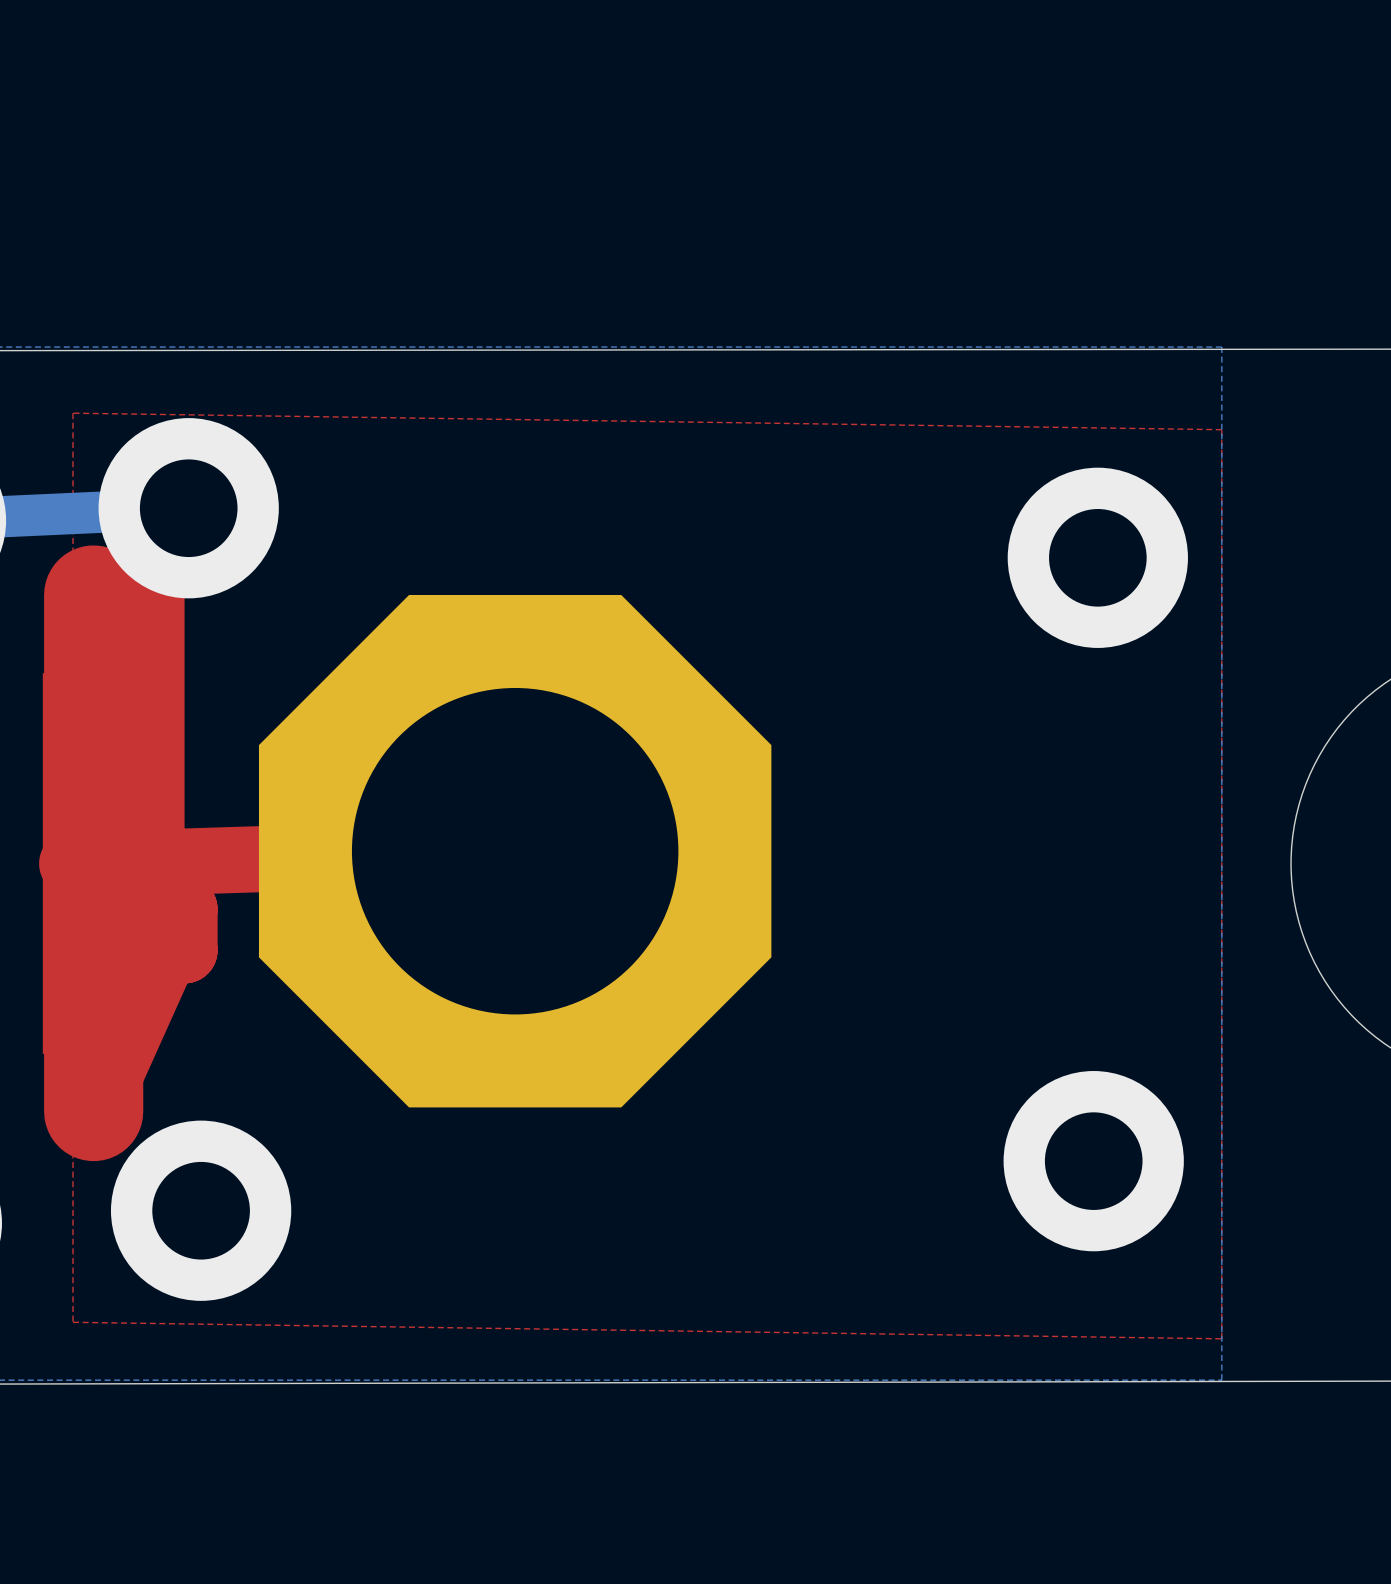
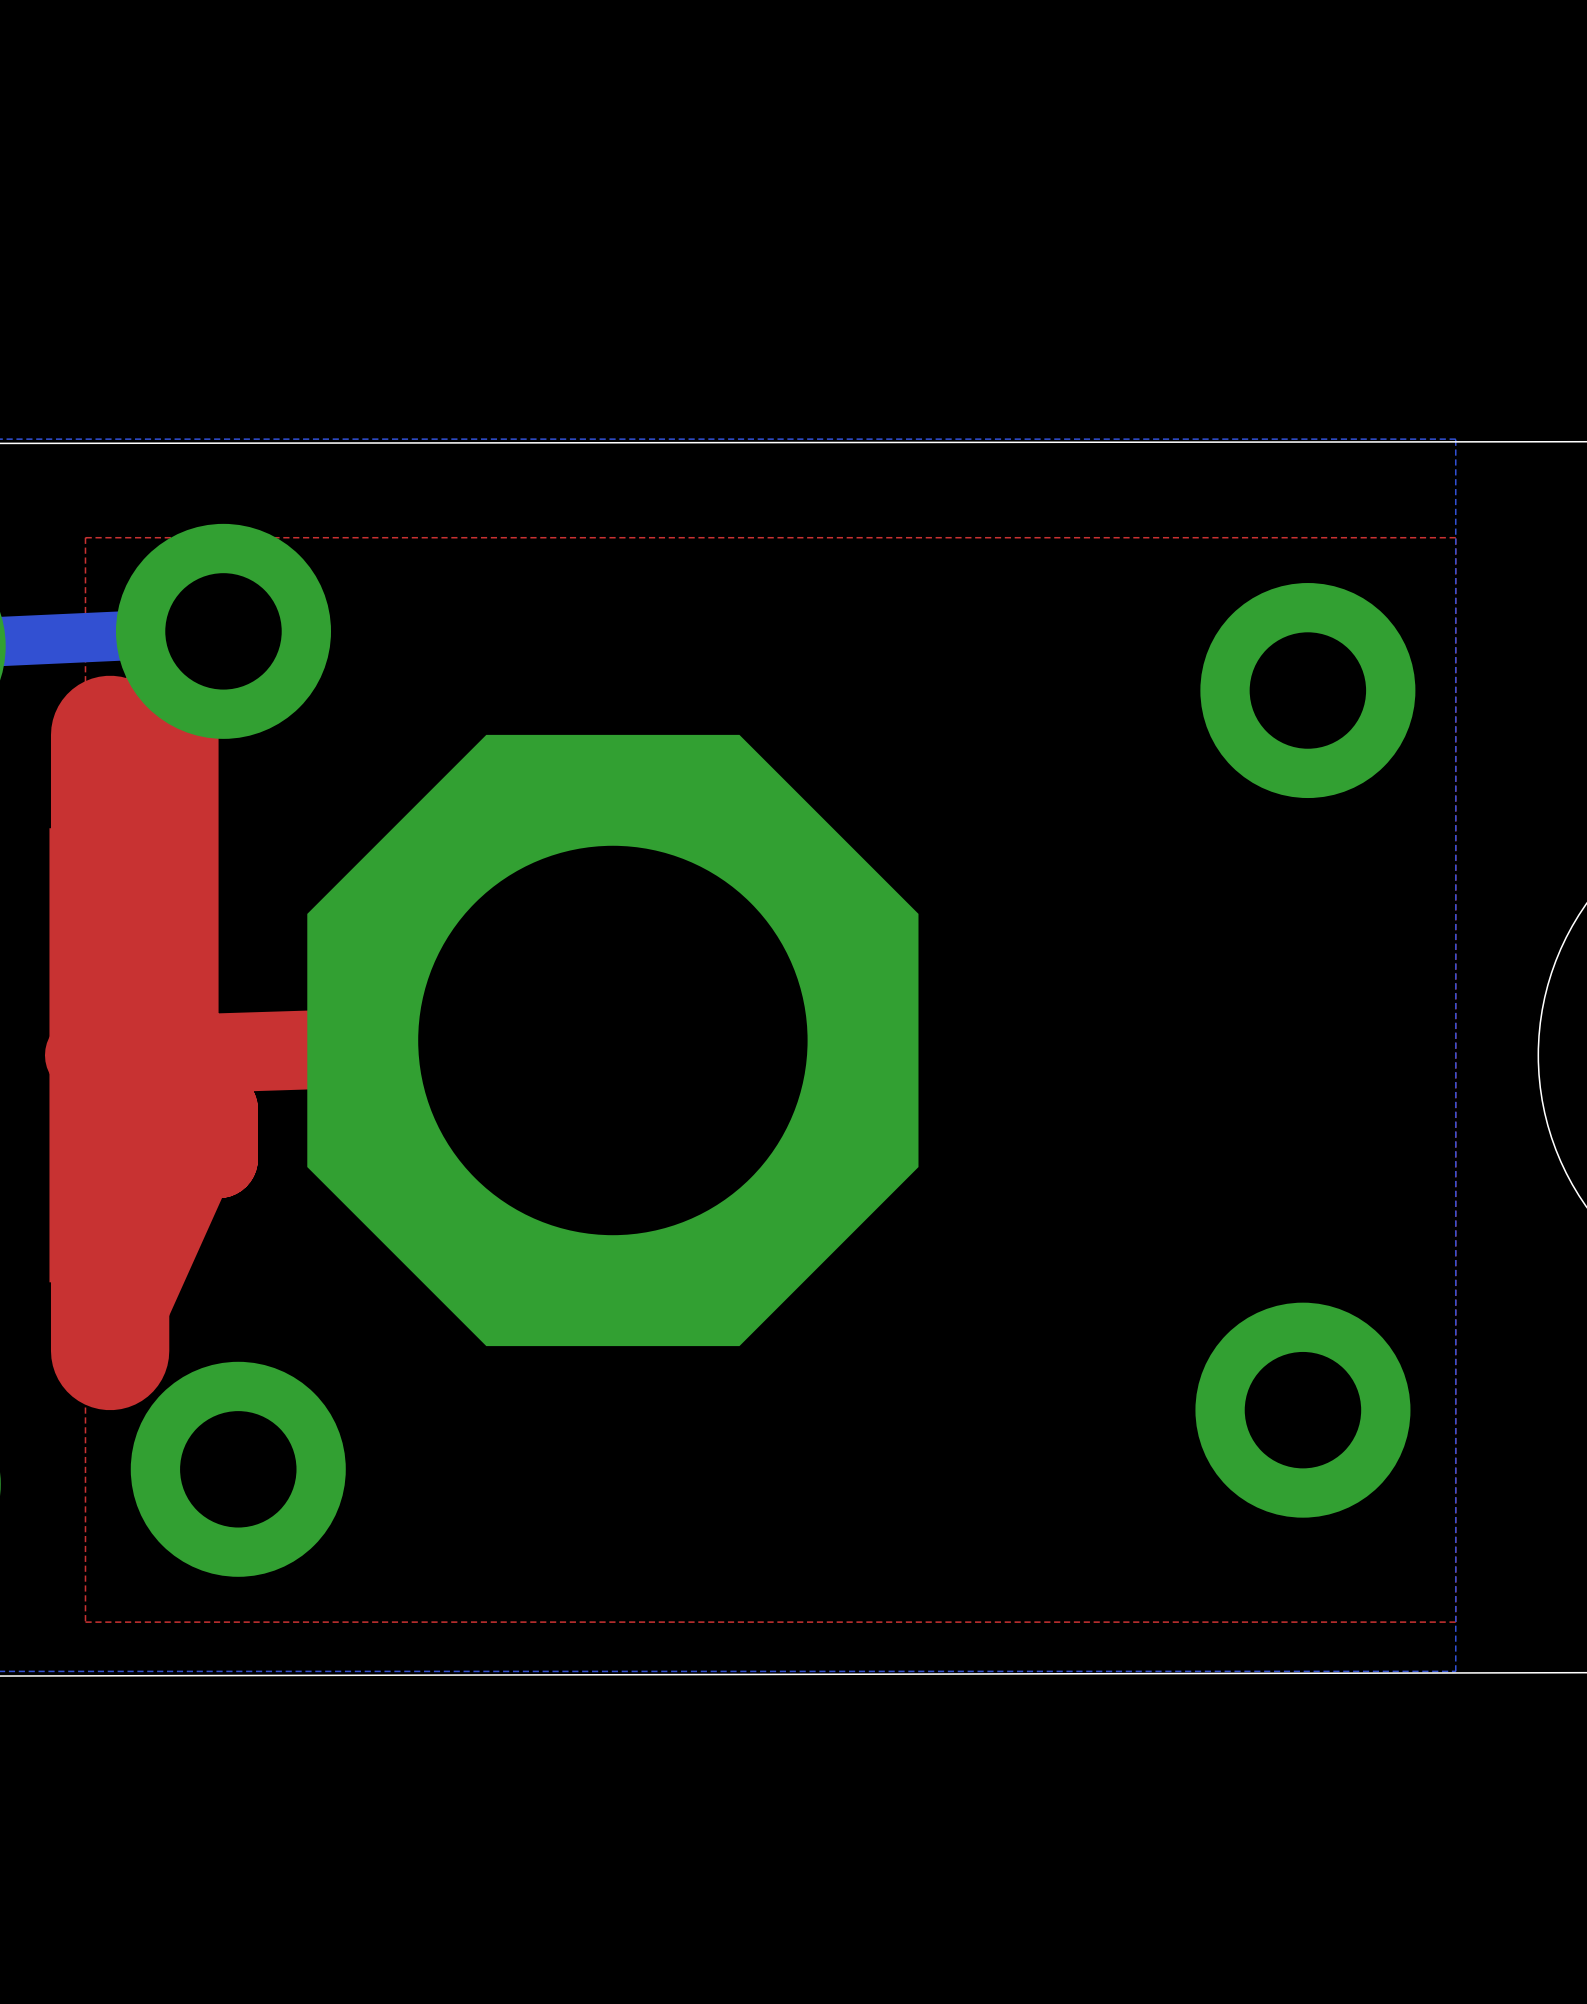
top zone outline: (1221, 429) (73, 413) (73, 429) -> (1455, 537) (85, 537)
top zone outline: (73, 1322) (1221, 1338) -> (85, 1602) (85, 1622) (1455, 1622)

